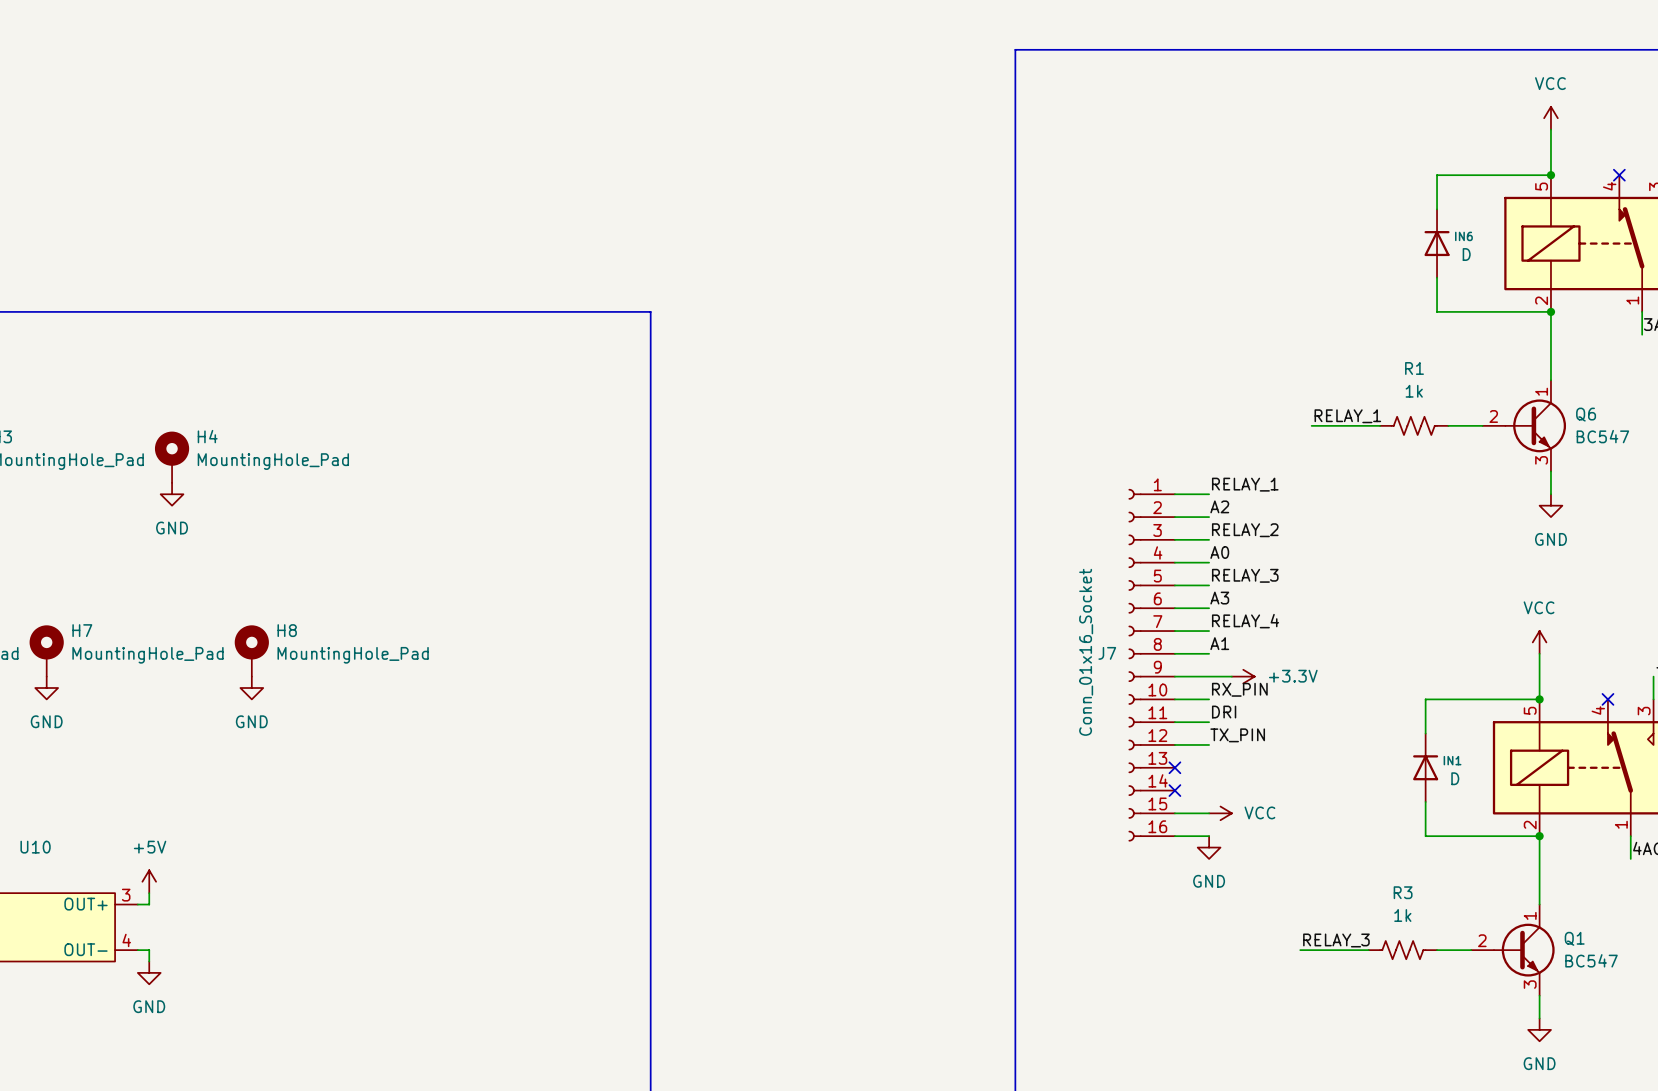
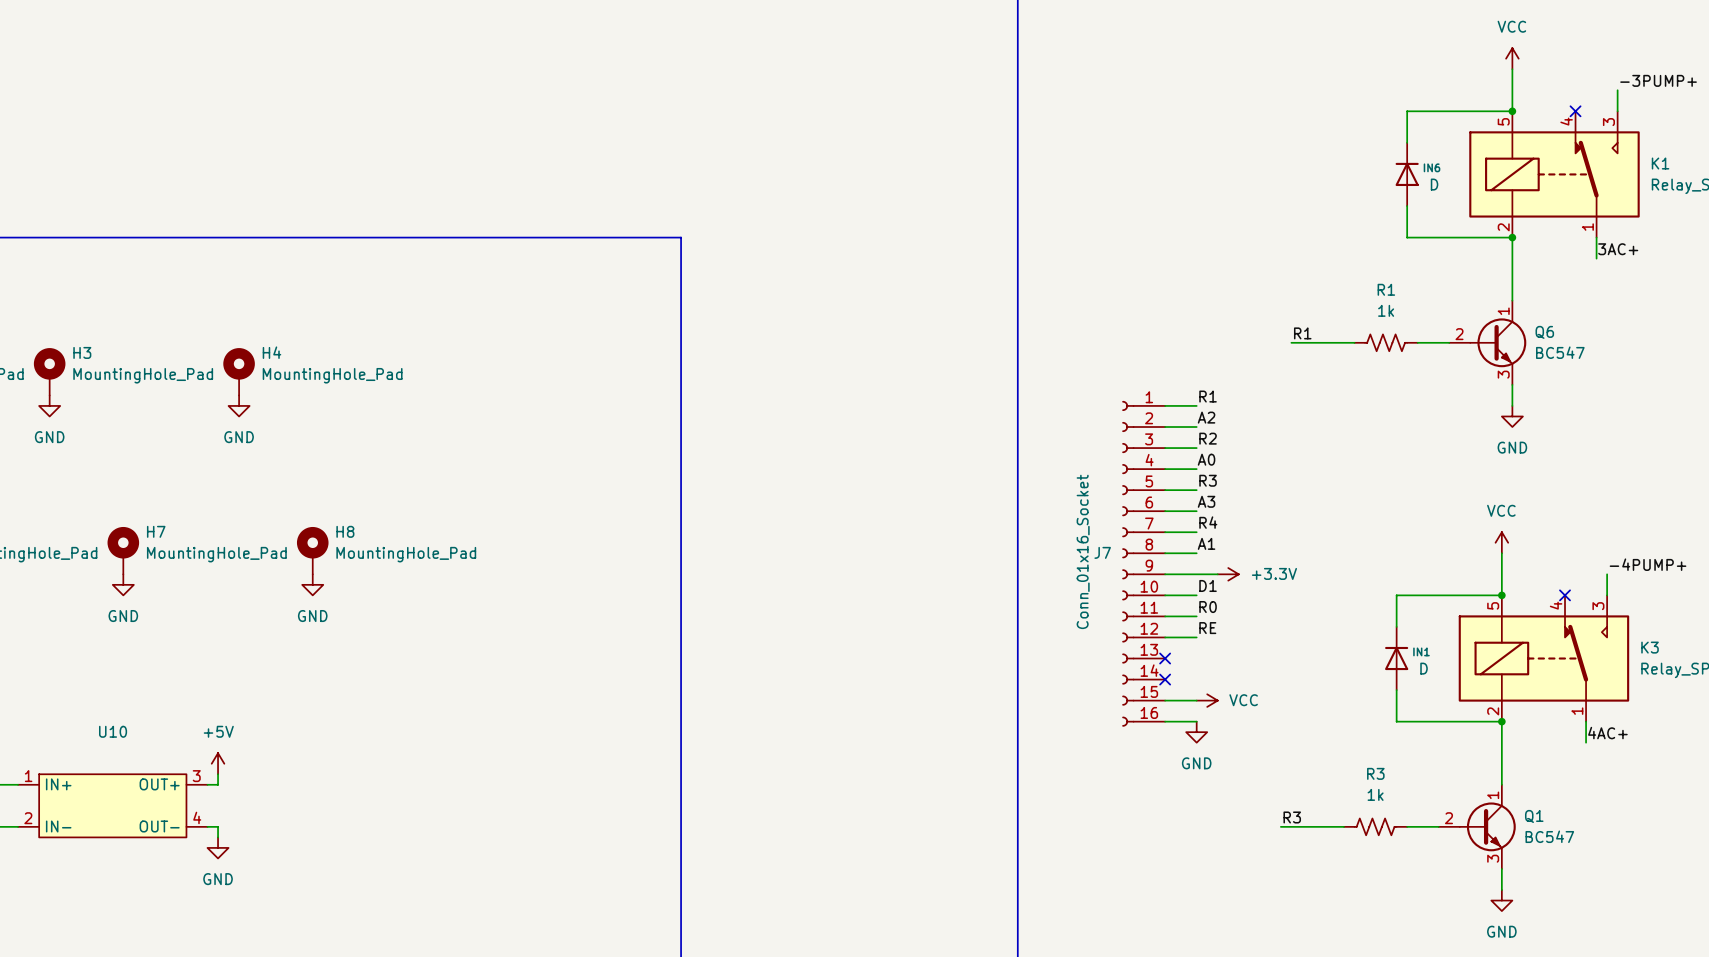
label: RELAY_1 (1347, 416) -> R1 (1302, 333)
label: RELAY_1 (1245, 484) -> R1 (1208, 396)
label: RELAY_2 (1245, 530) -> R2 (1208, 438)
label: RELAY_3 (1245, 575) -> R3 (1208, 480)
label: RELAY_4 (1245, 621) -> R4 (1208, 522)
label: RX_PIN (1239, 689) -> D1 (1208, 585)
label: DRI (1224, 712) -> R0 (1208, 607)
label: TX_PIN (1237, 735) -> RE (1207, 628)
label: RELAY_3 (1336, 940) -> R3 (1292, 817)

